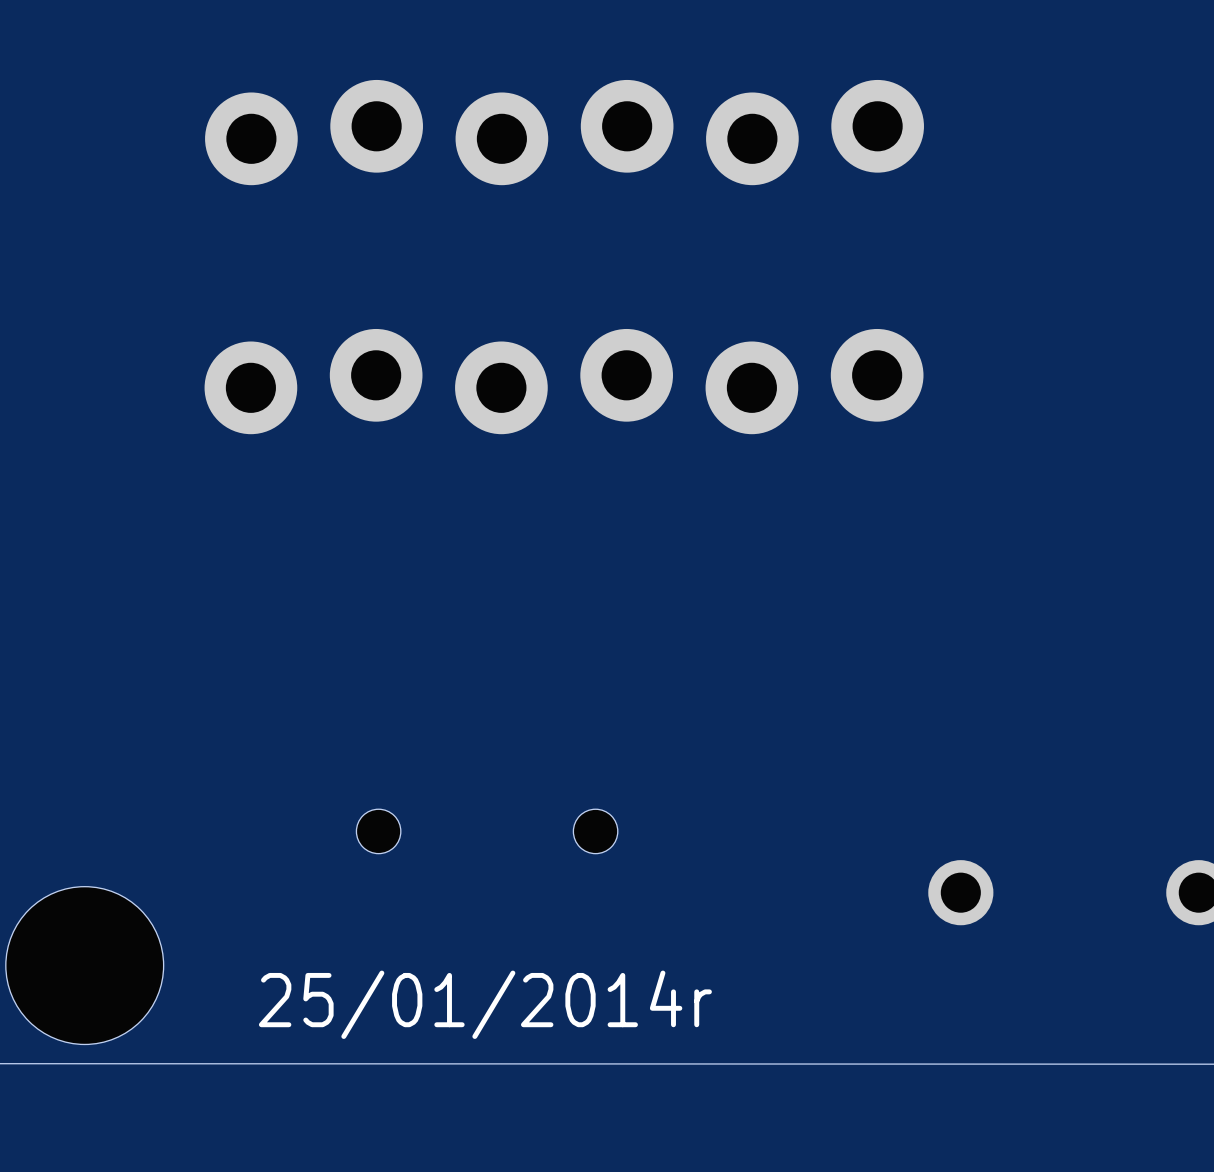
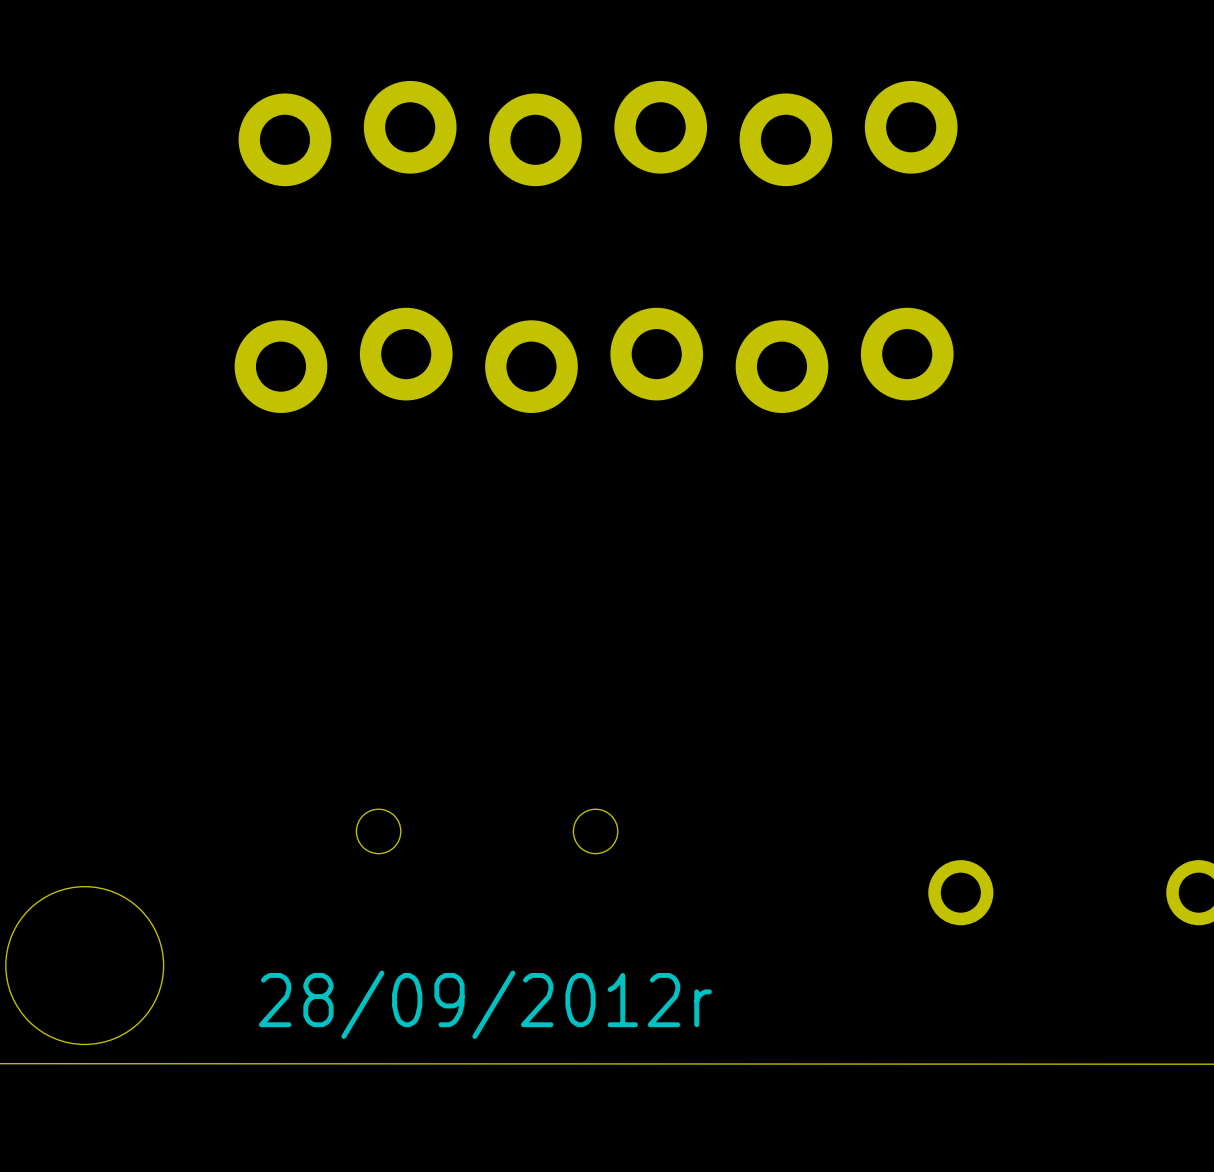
part position: (564, 132) -> (598, 133)
part position: (564, 381) -> (594, 360)
text: 25/01/2014r (485, 1004) -> 28/09/2012r (485, 1004)

